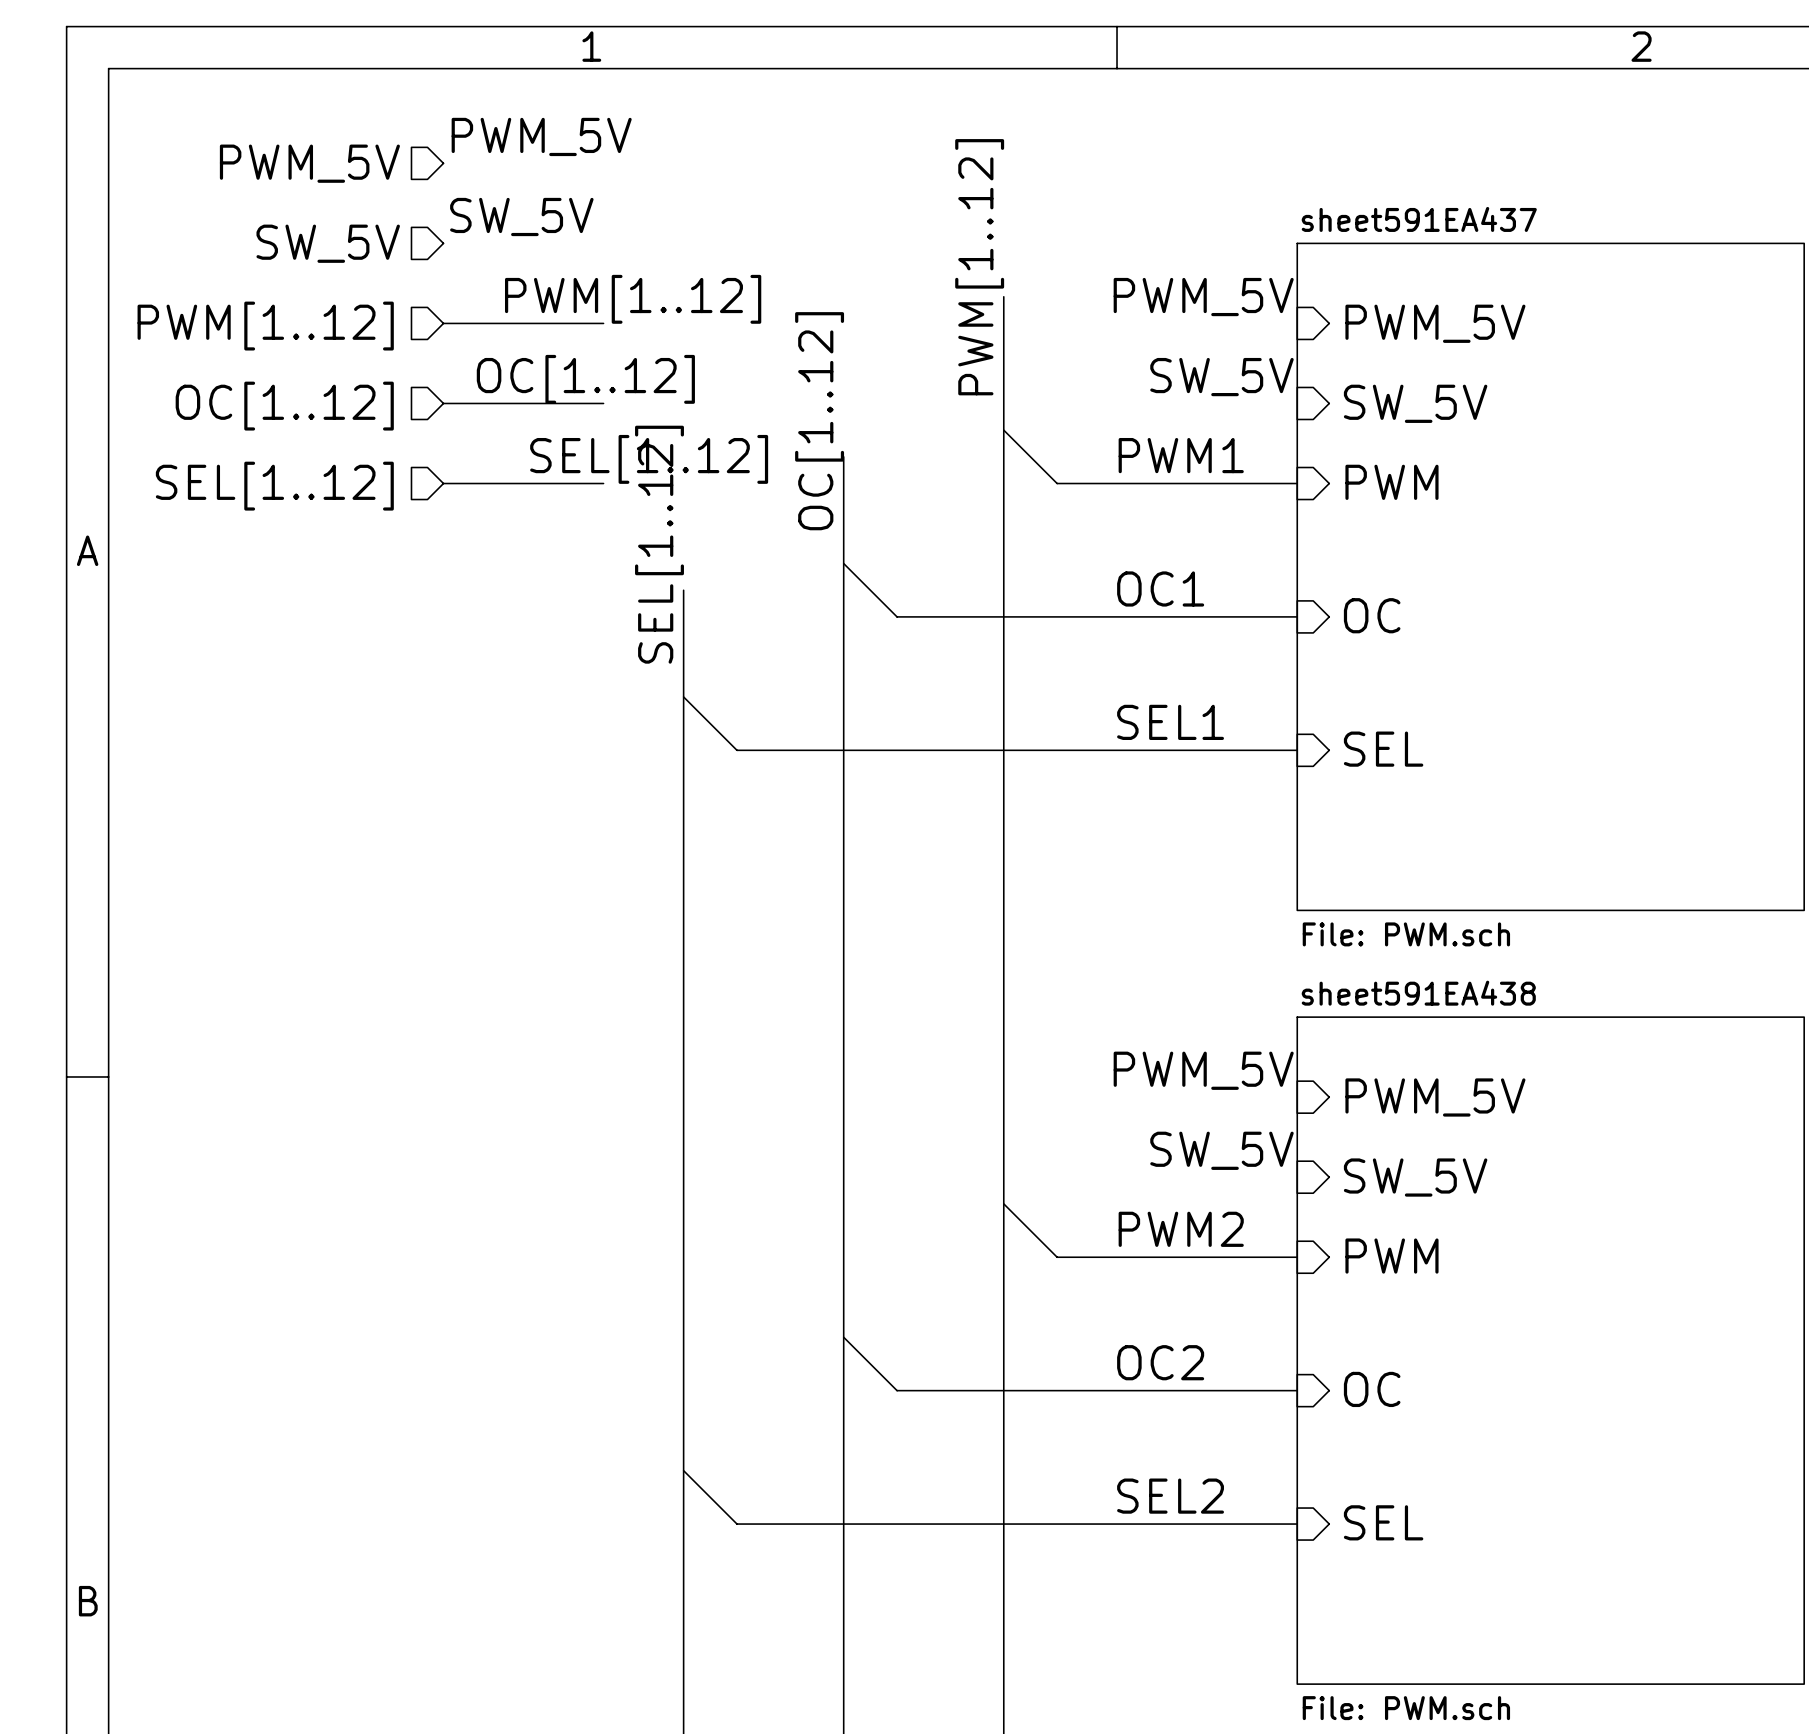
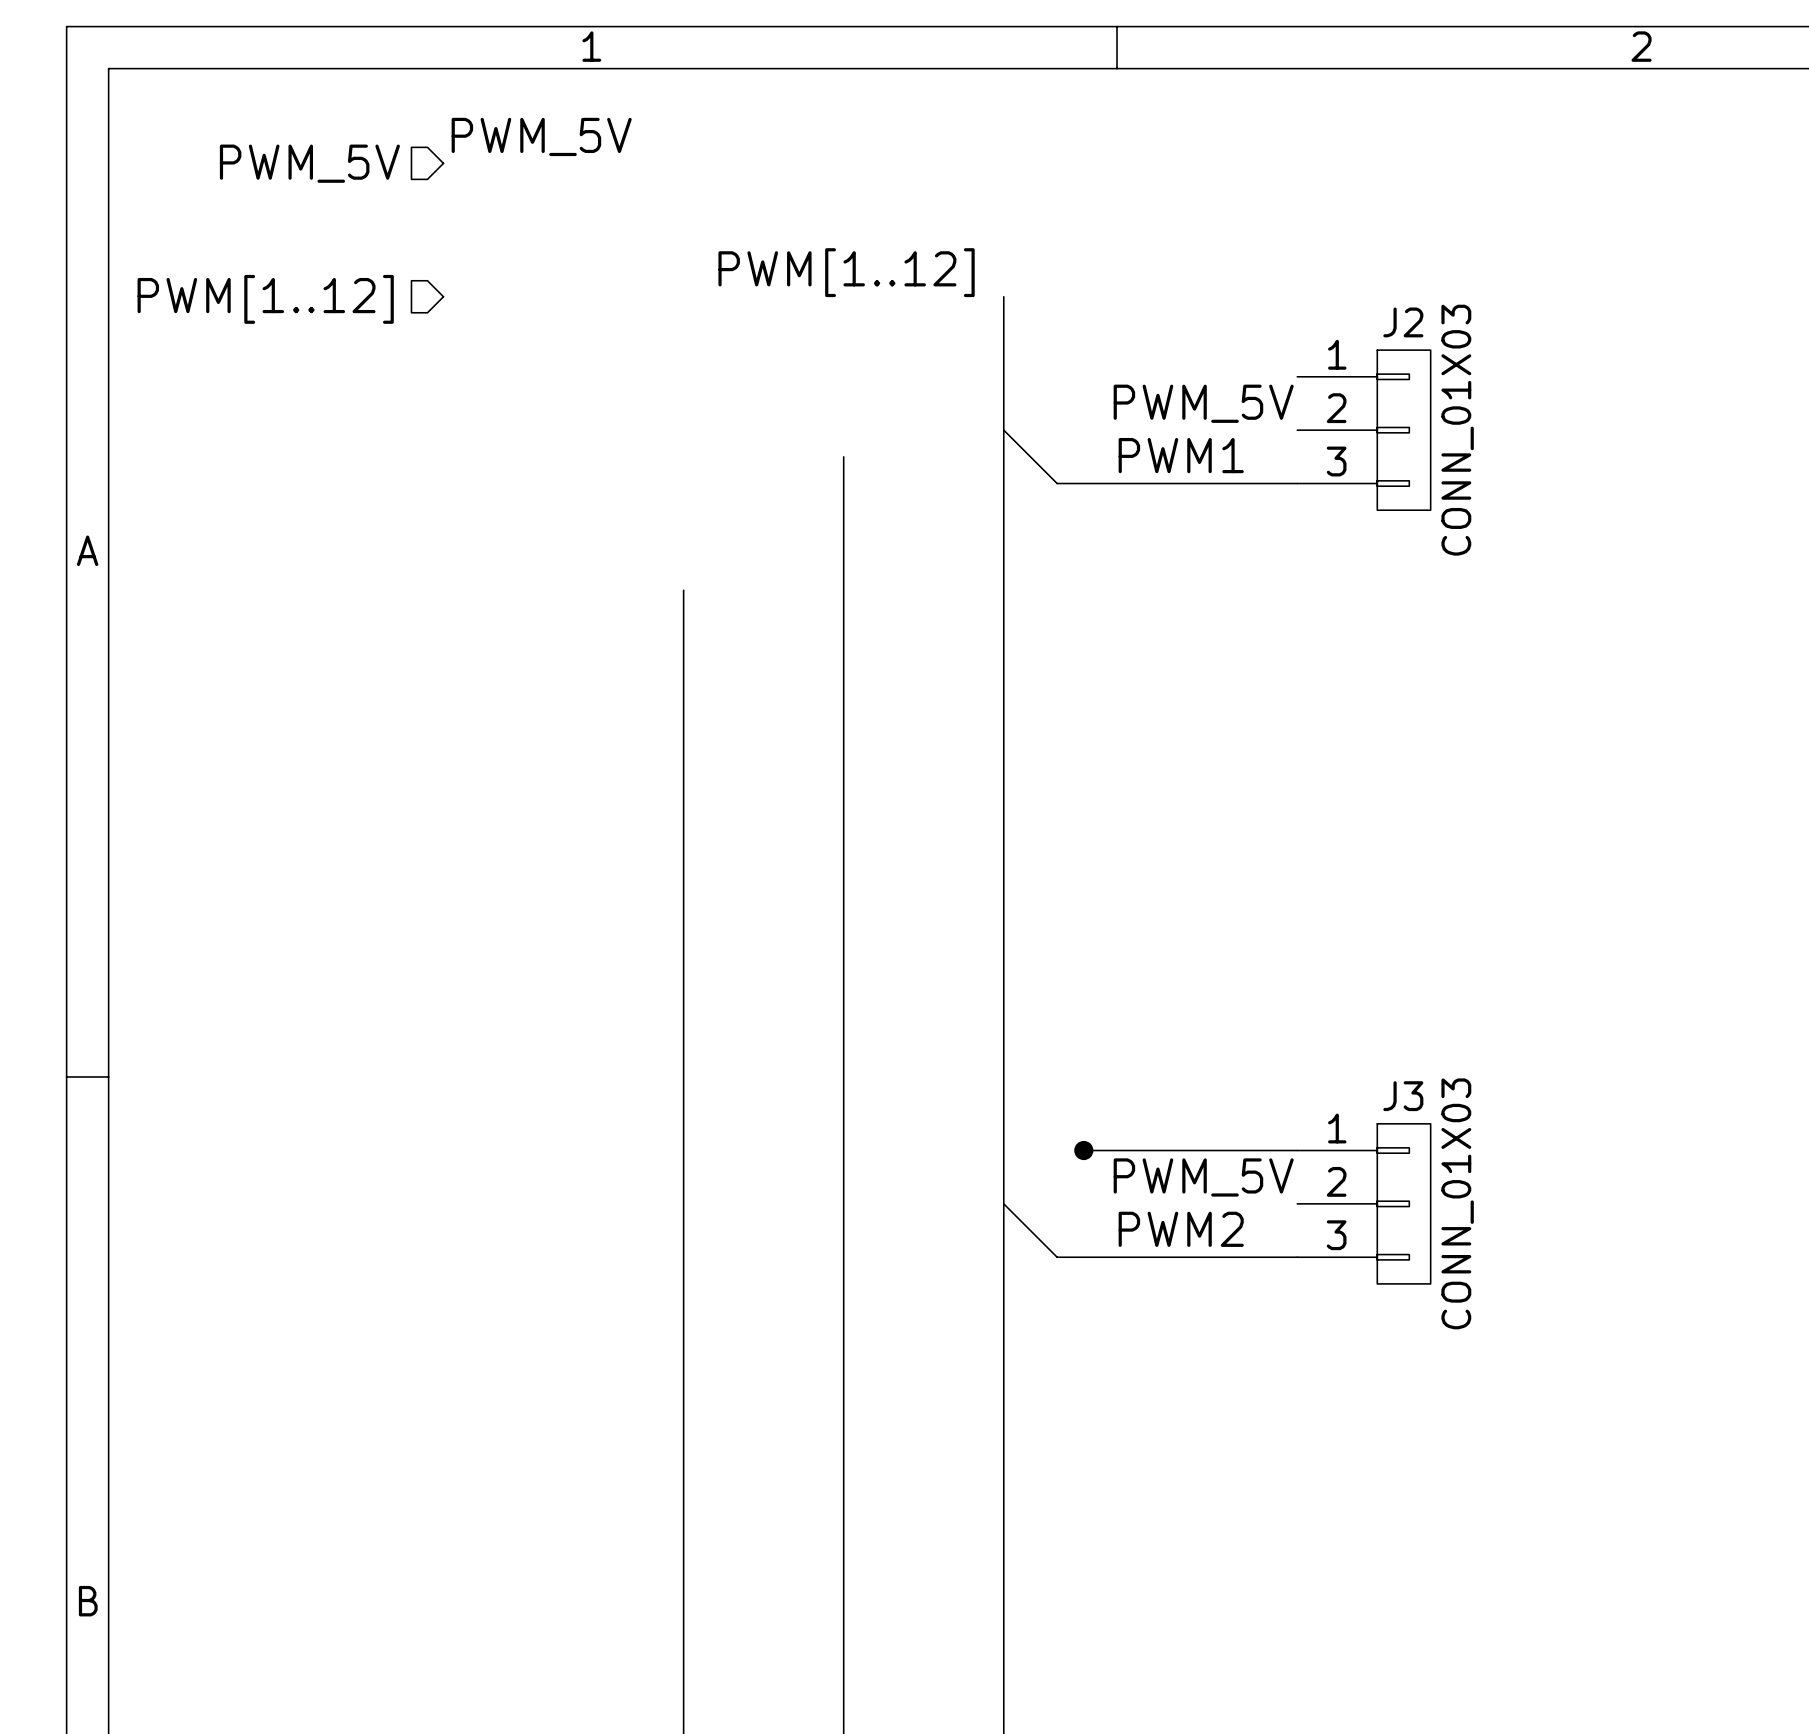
label: SW_5V (521, 216) -> none
hierarchical label: SW_5V (328, 243) -> none
label: PWM[1..12] (979, 267) -> none
label: none -> PWM[1..12] (846, 272)
label position: PWM_5V (1203, 297) -> PWM_5V (1203, 403)
label: PWM[1..12] (633, 299) -> none
bus: (443, 323) (603, 323) -> none
sheet pin: PWM_5V (1435, 323) -> none
hierarchical label position: PWM[1..12] (265, 326) -> PWM[1..12] (265, 299)
label: SW_5V (1221, 377) -> none
label: OC[1..12] (585, 379) -> none
bus: (443, 403) (603, 403) -> none
sheet pin: SW_5V (1415, 403) -> none
hierarchical label: OC[1..12] (284, 406) -> none
label: OC[1..12] (819, 421) -> none
J2: none -> CONN_01X03 (1363, 430)
label: SEL[1..12] (649, 459) -> none
sheet pin: PWM (1391, 482) -> none
bus: (443, 483) (603, 483) -> none
hierarchical label: SEL[1..12] (274, 486) -> none
label: SEL[1..12] (659, 544) -> none
wire: (843, 563) (897, 616) (1297, 616) -> none
sheet sheet591EA437: File: PWM.sch (1550, 576) -> none
label: OC1 (1160, 588) -> none
sheet pin: OC (1372, 615) -> none
wire: (683, 696) (736, 750) (1297, 750) -> none
label: SEL1 (1170, 722) -> none
sheet pin: SEL (1383, 749) -> none
label position: PWM_5V (1203, 1070) -> PWM_5V (1203, 1177)
sheet pin: PWM_5V (1435, 1097) -> none
wire: none -> (1083, 1150) (1297, 1150)
junction: none -> (1083, 1150)
label: SW_5V (1221, 1150) -> none
sheet pin: SW_5V (1415, 1177) -> none
J3: none -> CONN_01X03 (1363, 1203)
sheet pin: PWM (1391, 1256) -> none
wire: (843, 1337) (897, 1390) (1297, 1390) -> none
sheet sheet591EA438: File: PWM.sch (1550, 1350) -> none
label: OC2 (1160, 1362) -> none
sheet pin: OC (1372, 1389) -> none
wire: (683, 1470) (736, 1524) (1297, 1524) -> none
label: SEL2 (1170, 1496) -> none
sheet pin: SEL (1383, 1522) -> none

